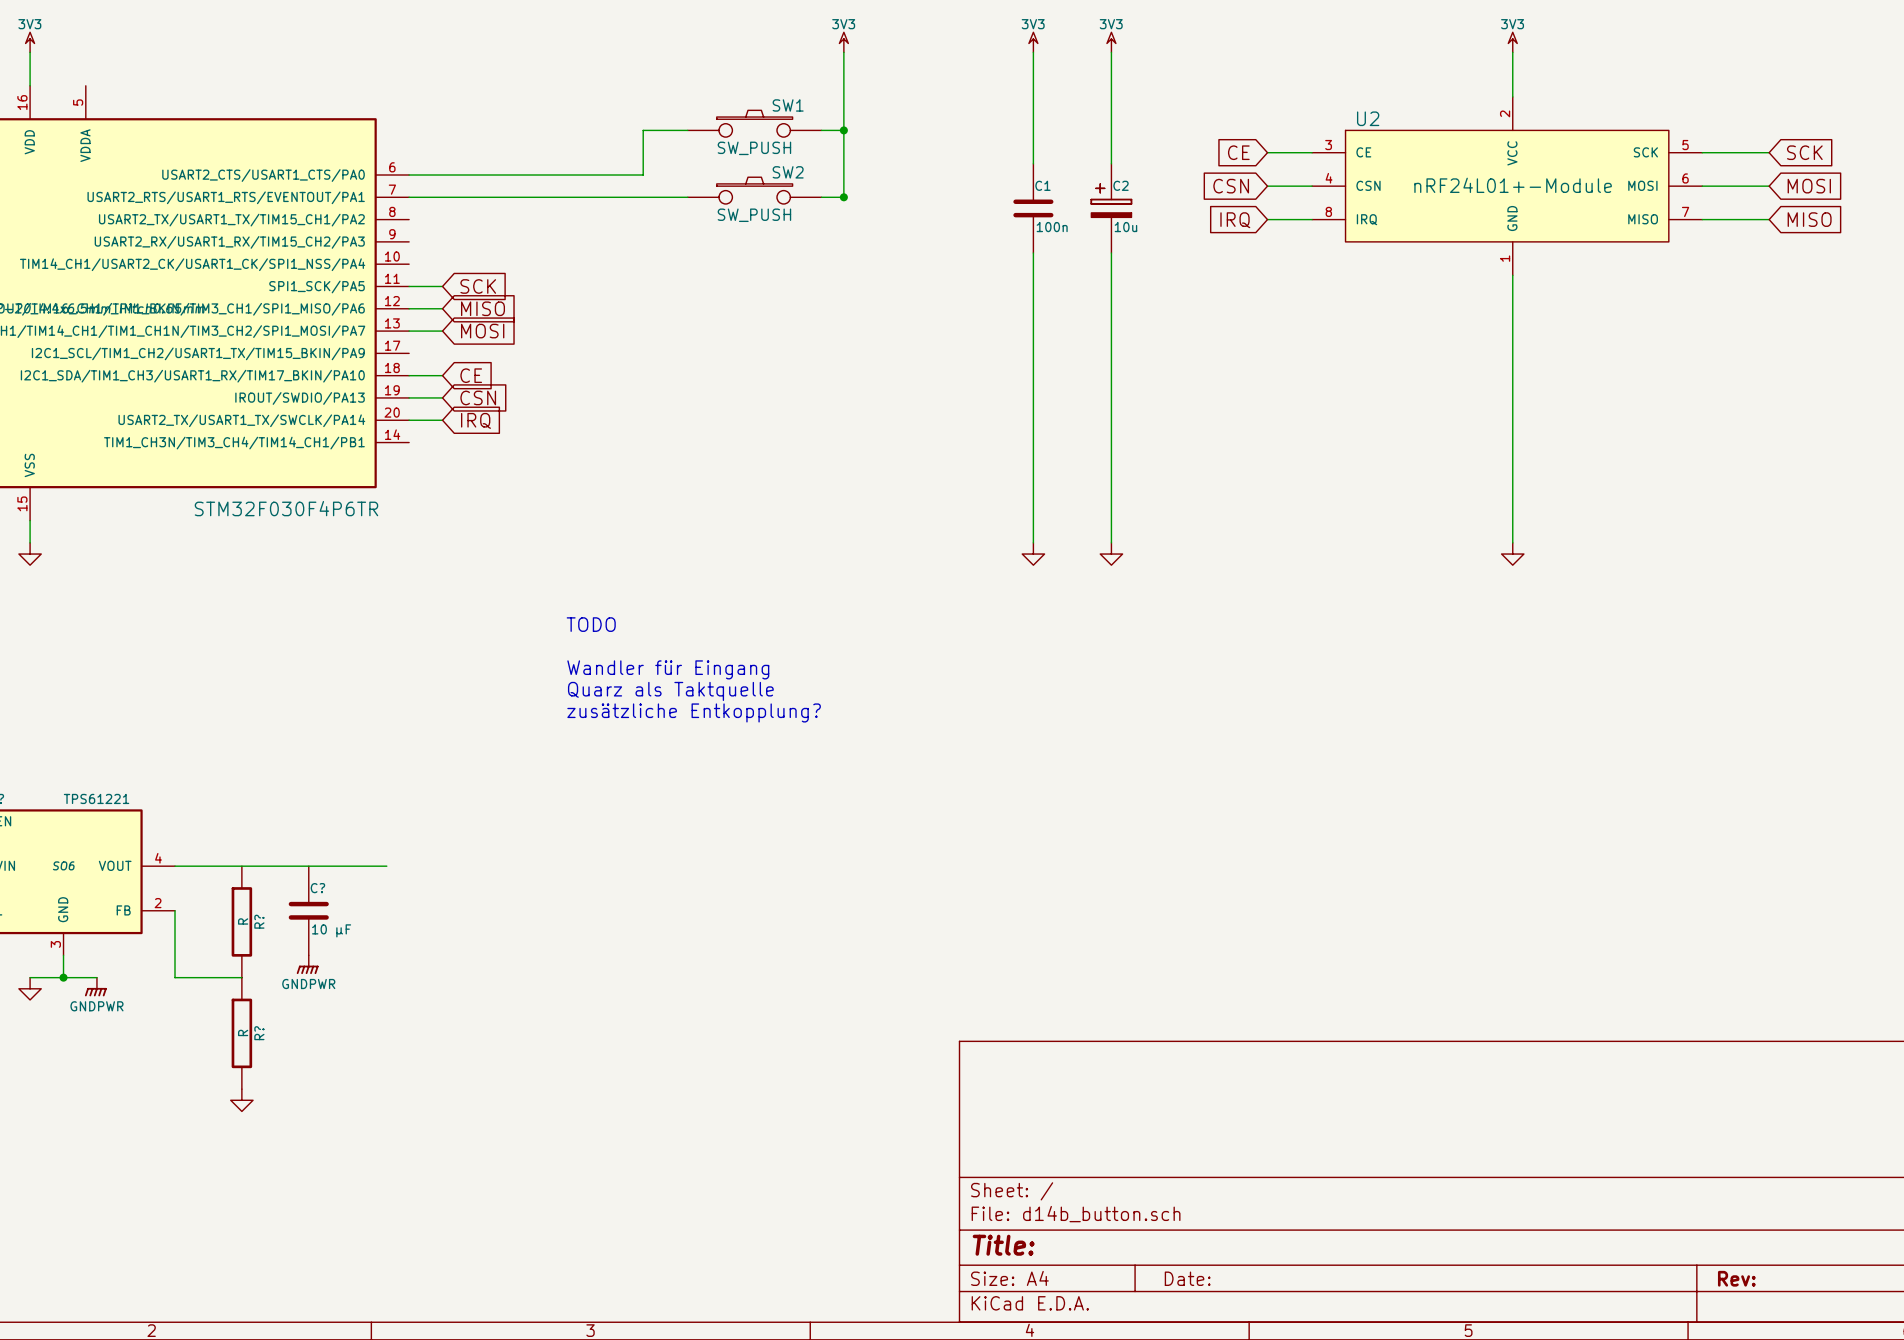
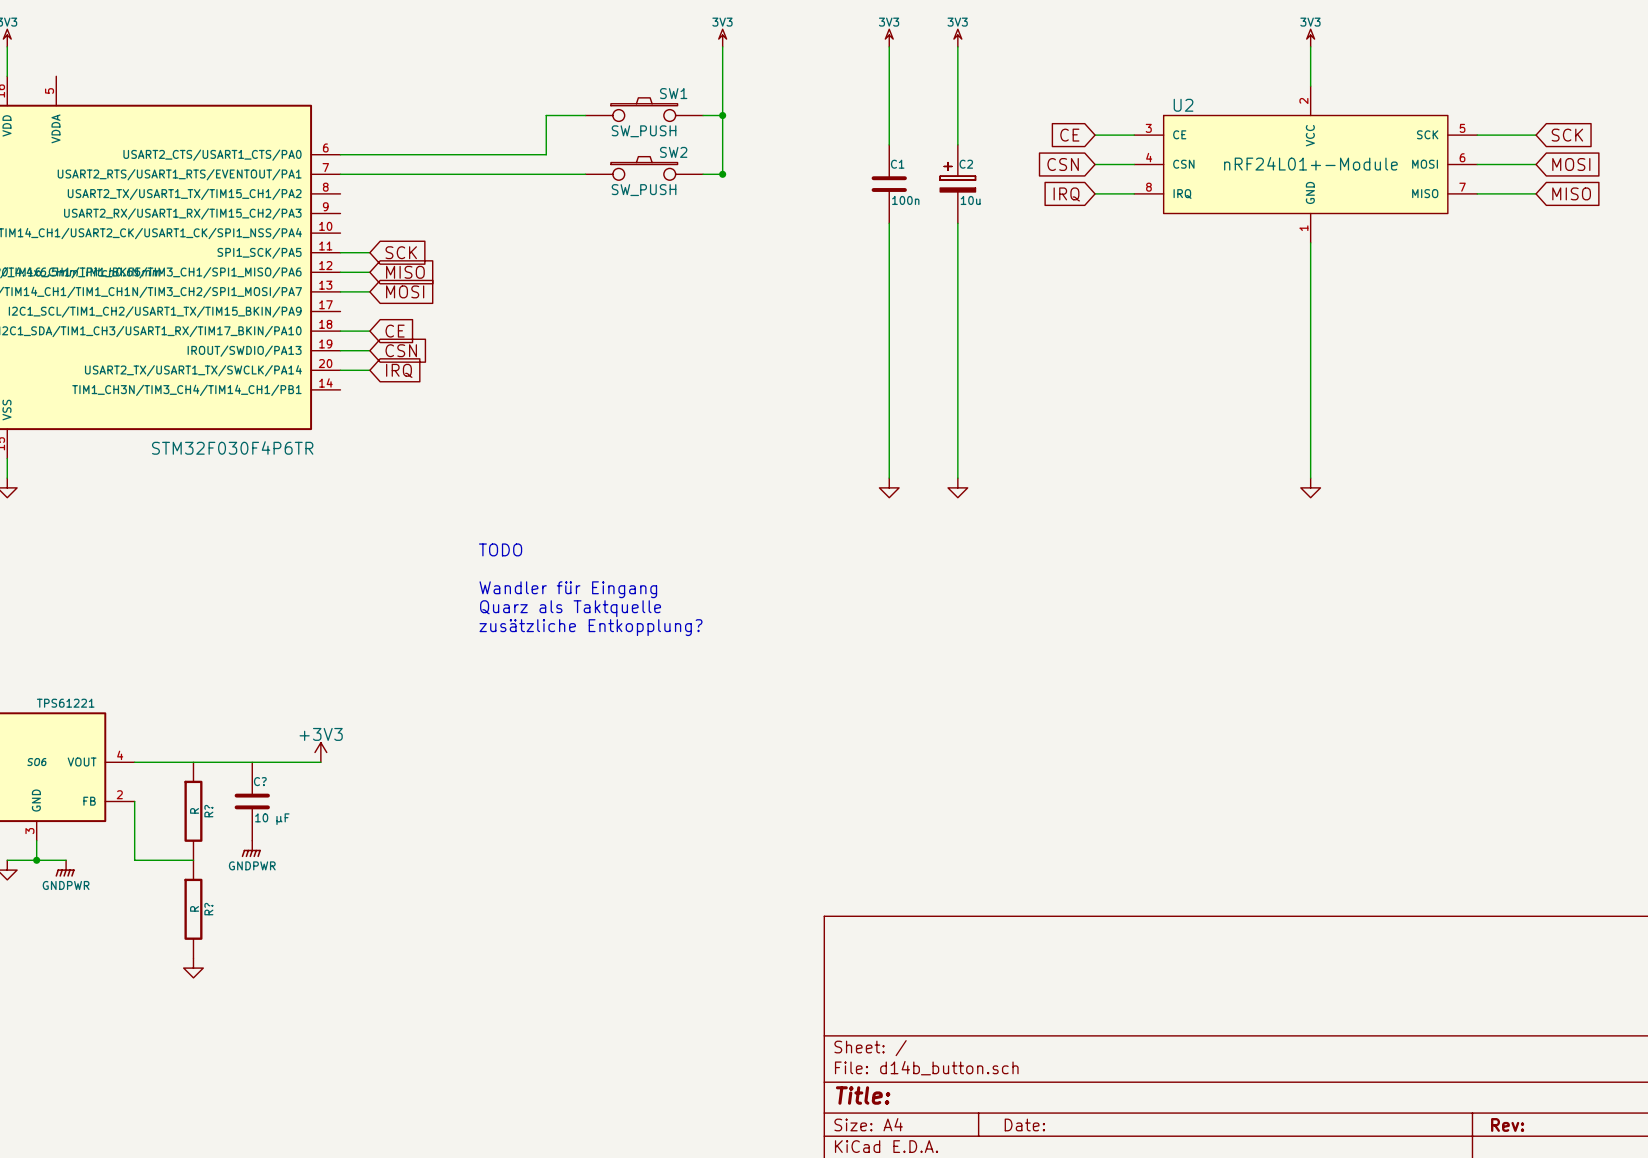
power symbol: none -> +3V3 (320, 752)

